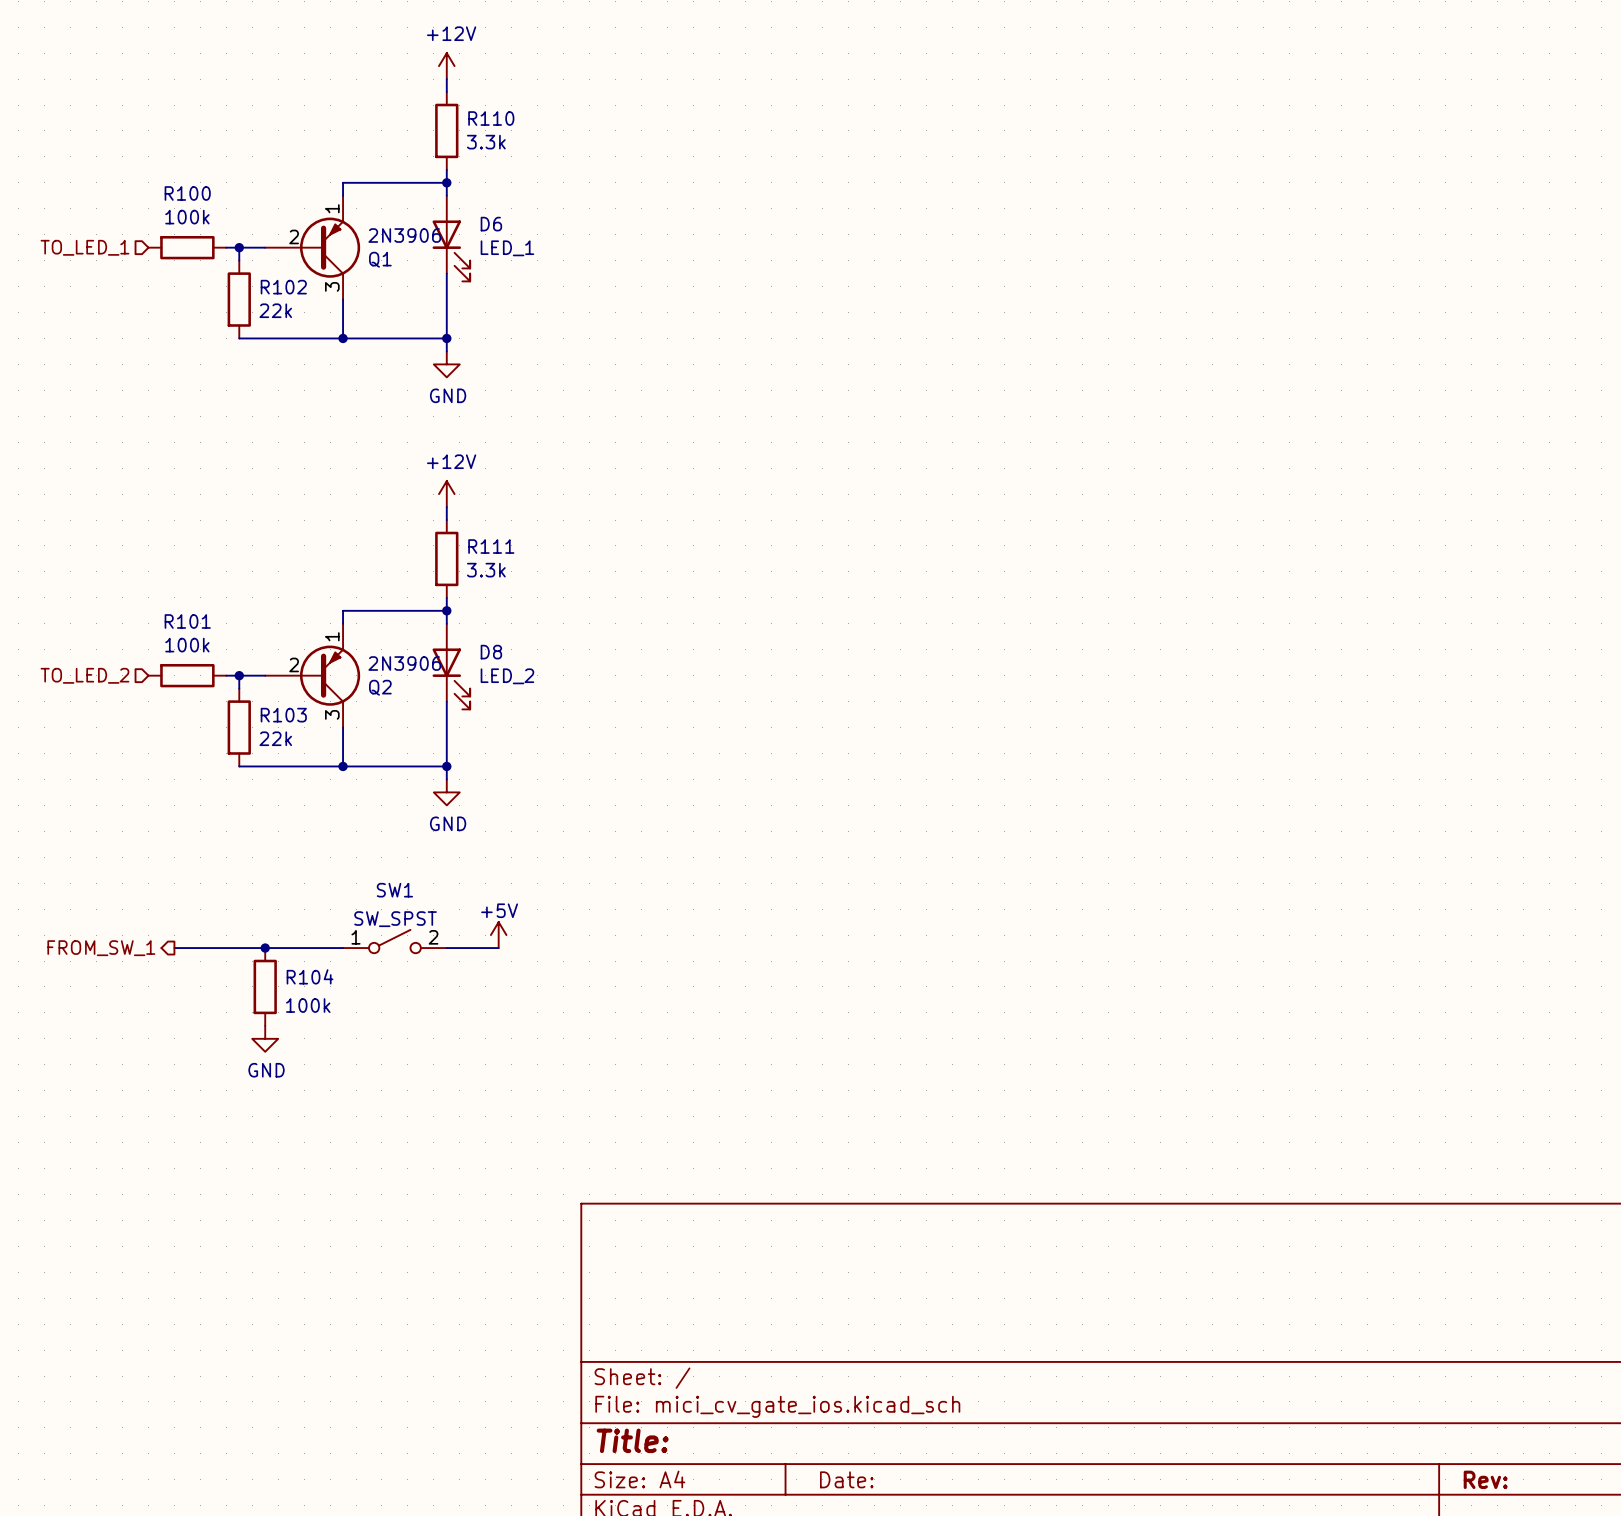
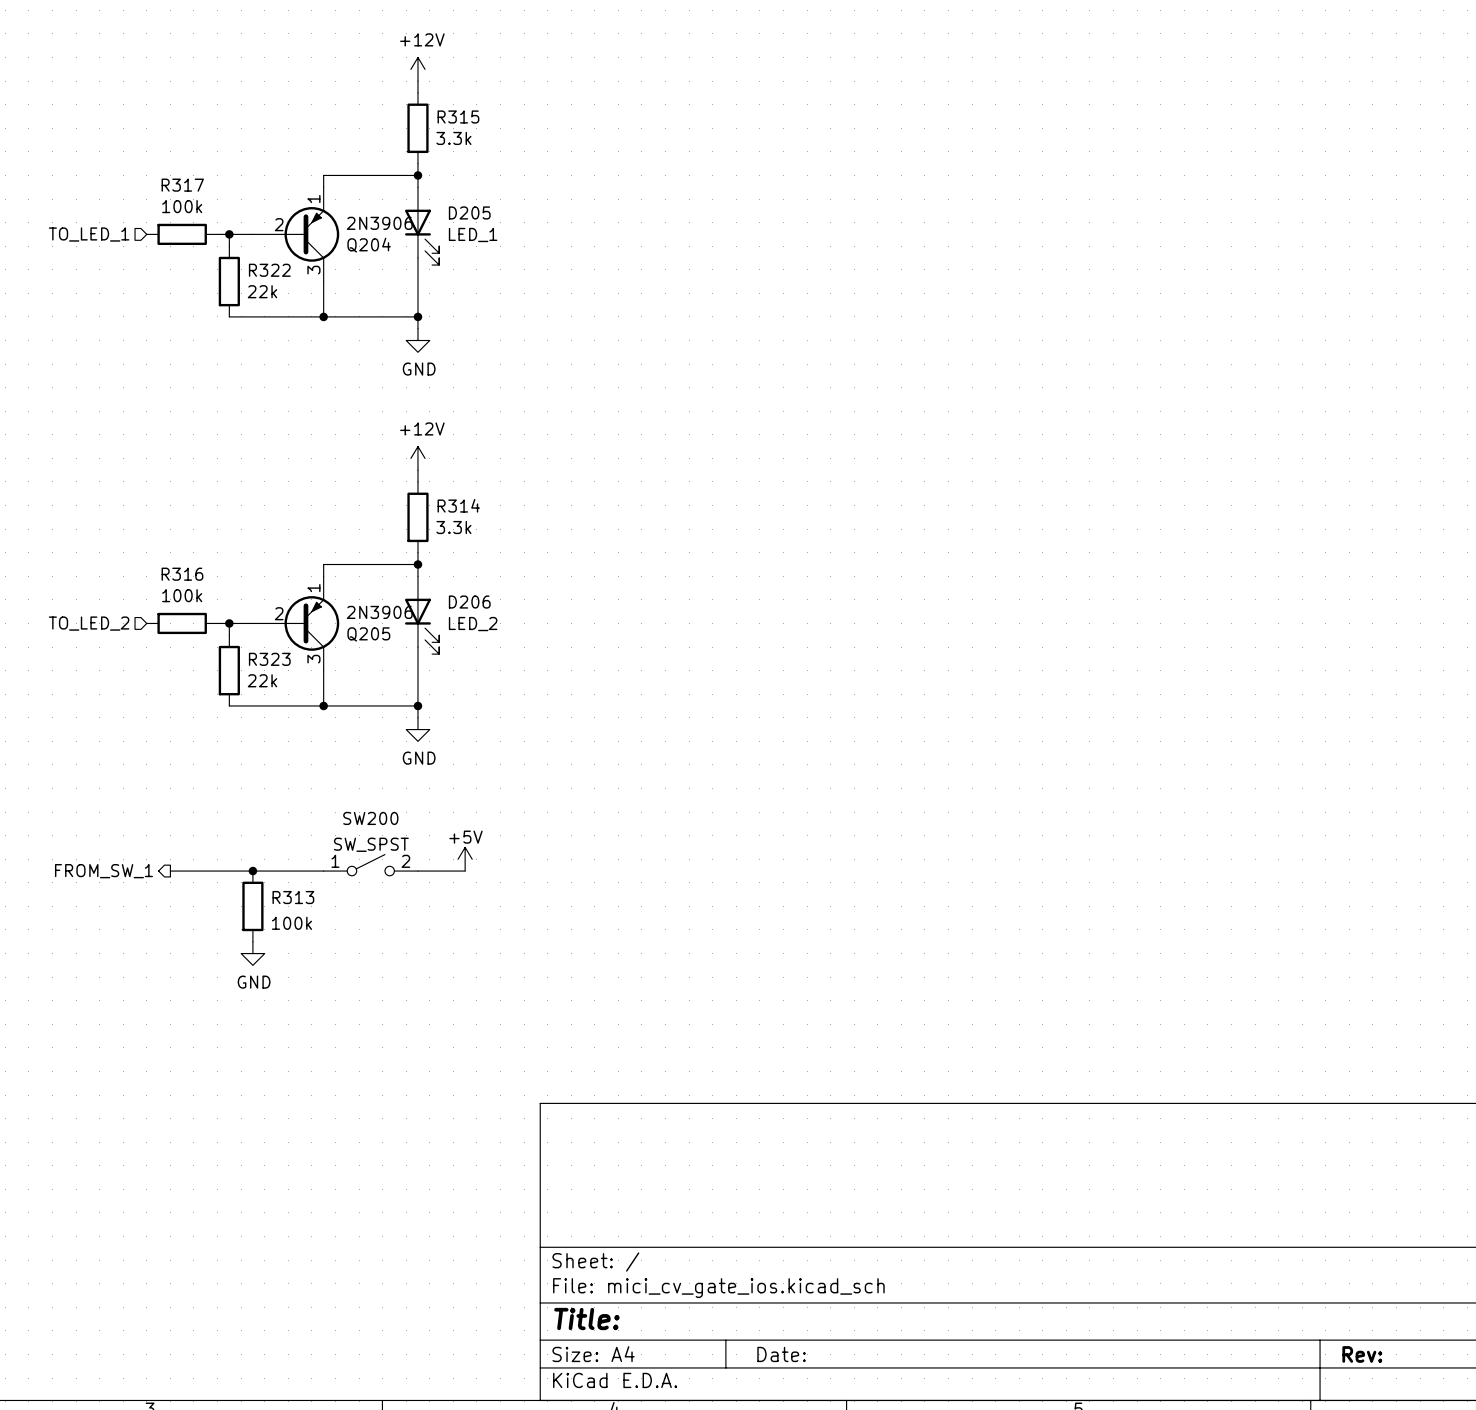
R110 name: R110 (491, 118) -> R315 (458, 117)
R100 name: R100 (187, 193) -> R317 (182, 185)
D6 name: D6 (491, 224) -> D205 (469, 212)
Q1 name: Q1 (380, 259) -> Q204 (369, 245)
R102 name: R102 (283, 287) -> R322 (269, 270)
R111 name: R111 (491, 546) -> R314 (458, 505)
R101 name: R101 (187, 621) -> R316 (182, 574)
D8 name: D8 (491, 652) -> D206 (469, 602)
Q2 name: Q2 (380, 687) -> Q205 (368, 634)
R103 name: R103 (283, 715) -> R323 (269, 659)
SW1 name: SW1 (394, 890) -> SW200 (370, 818)
R104 name: R104 (310, 976) -> R313 (293, 897)

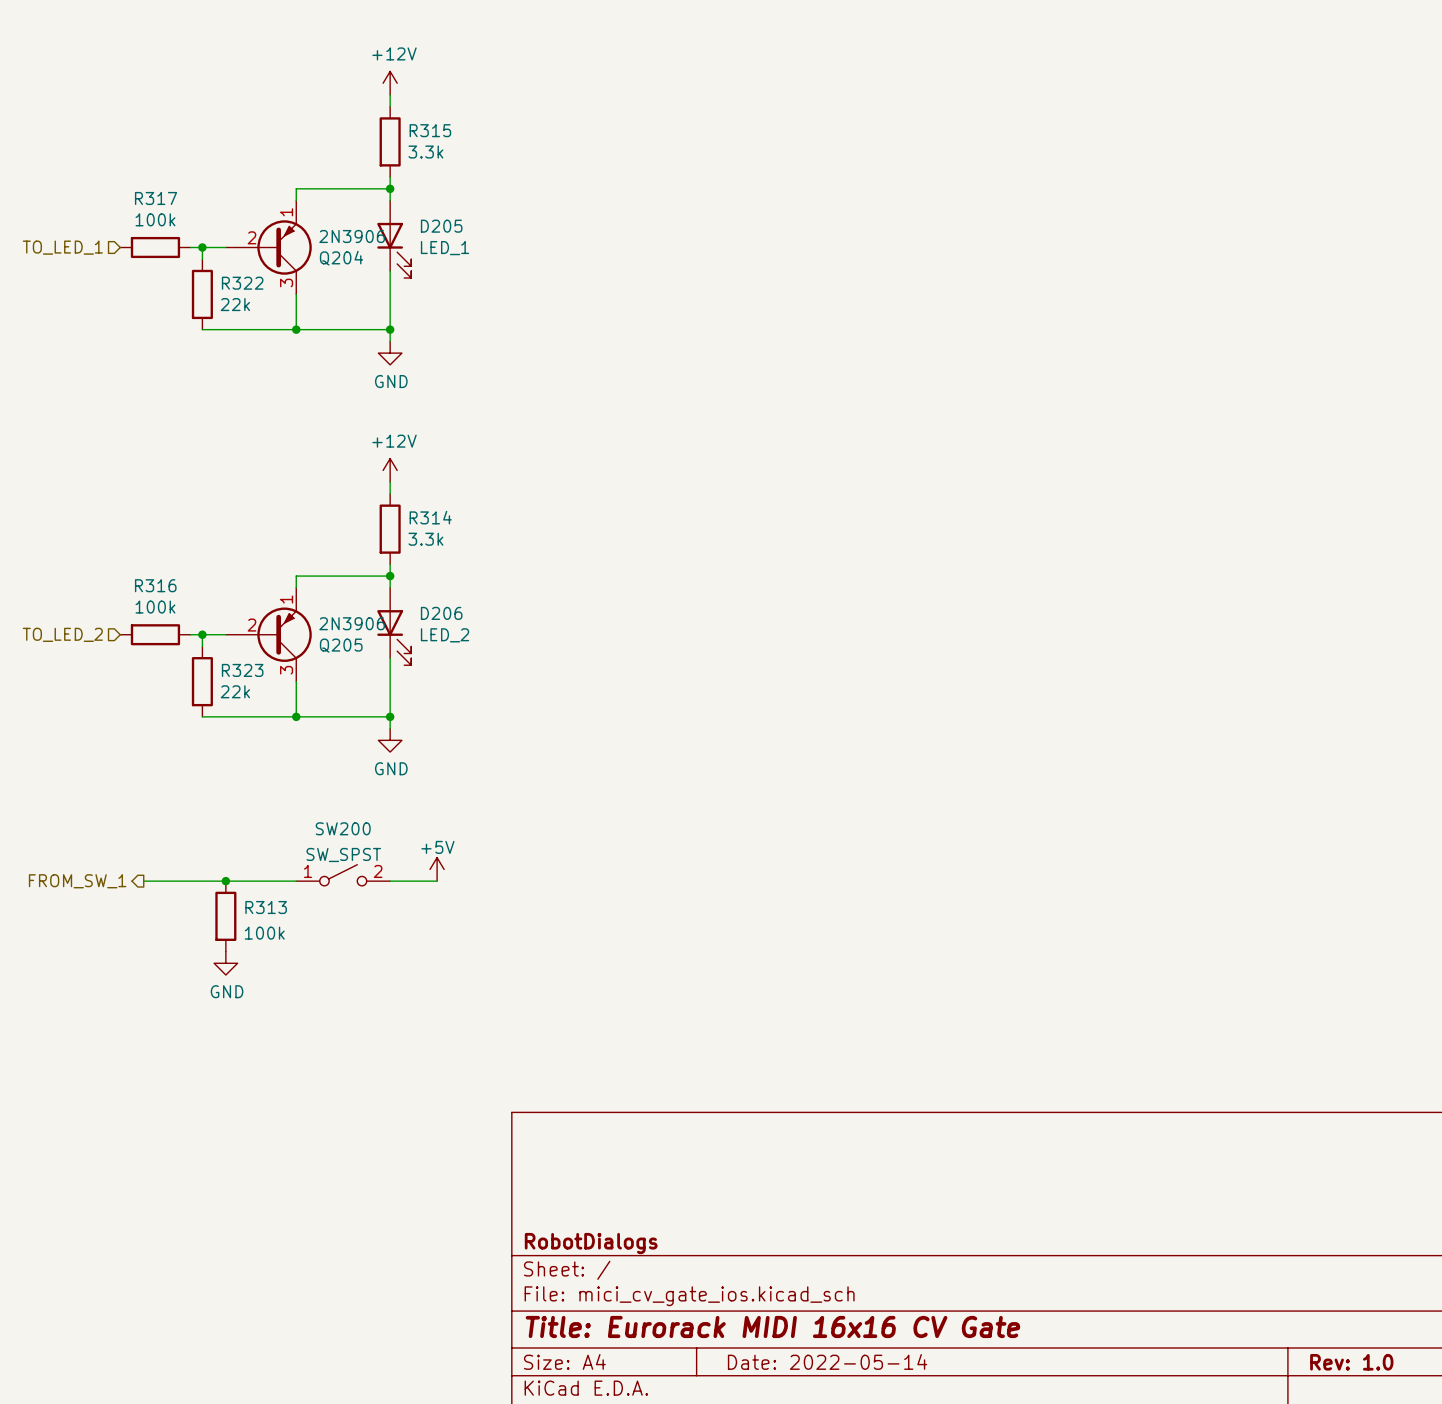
title block: none -> RobotDialogs (591, 1243)
title block: Title: (586, 1319) -> Title: Eurorack MIDI 16x16 CV Gate (772, 1326)
title block: Date: (781, 1354) -> Date: 2022-05-14 (827, 1361)
title block: Rev: (1362, 1354) -> Rev: 1.0 (1351, 1362)

